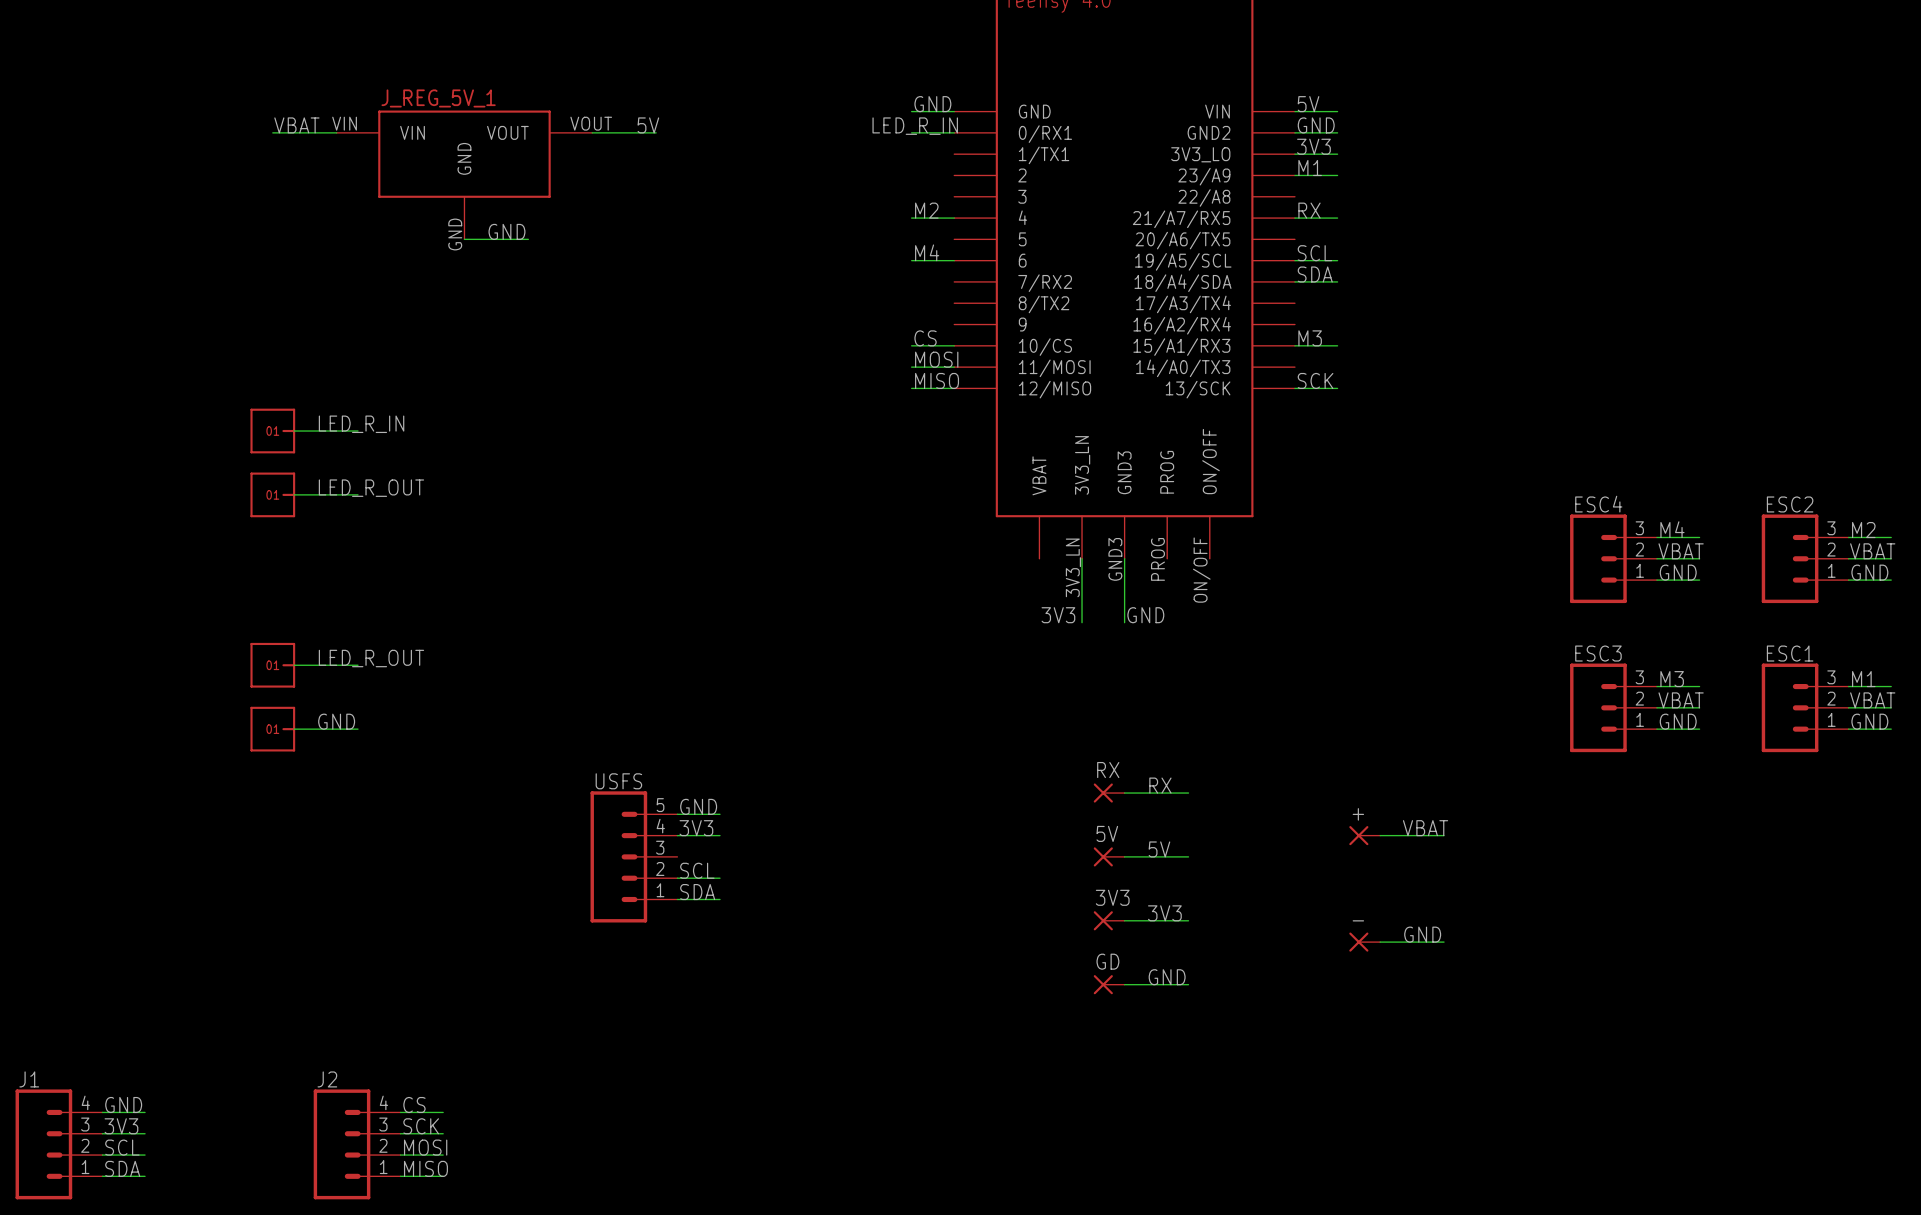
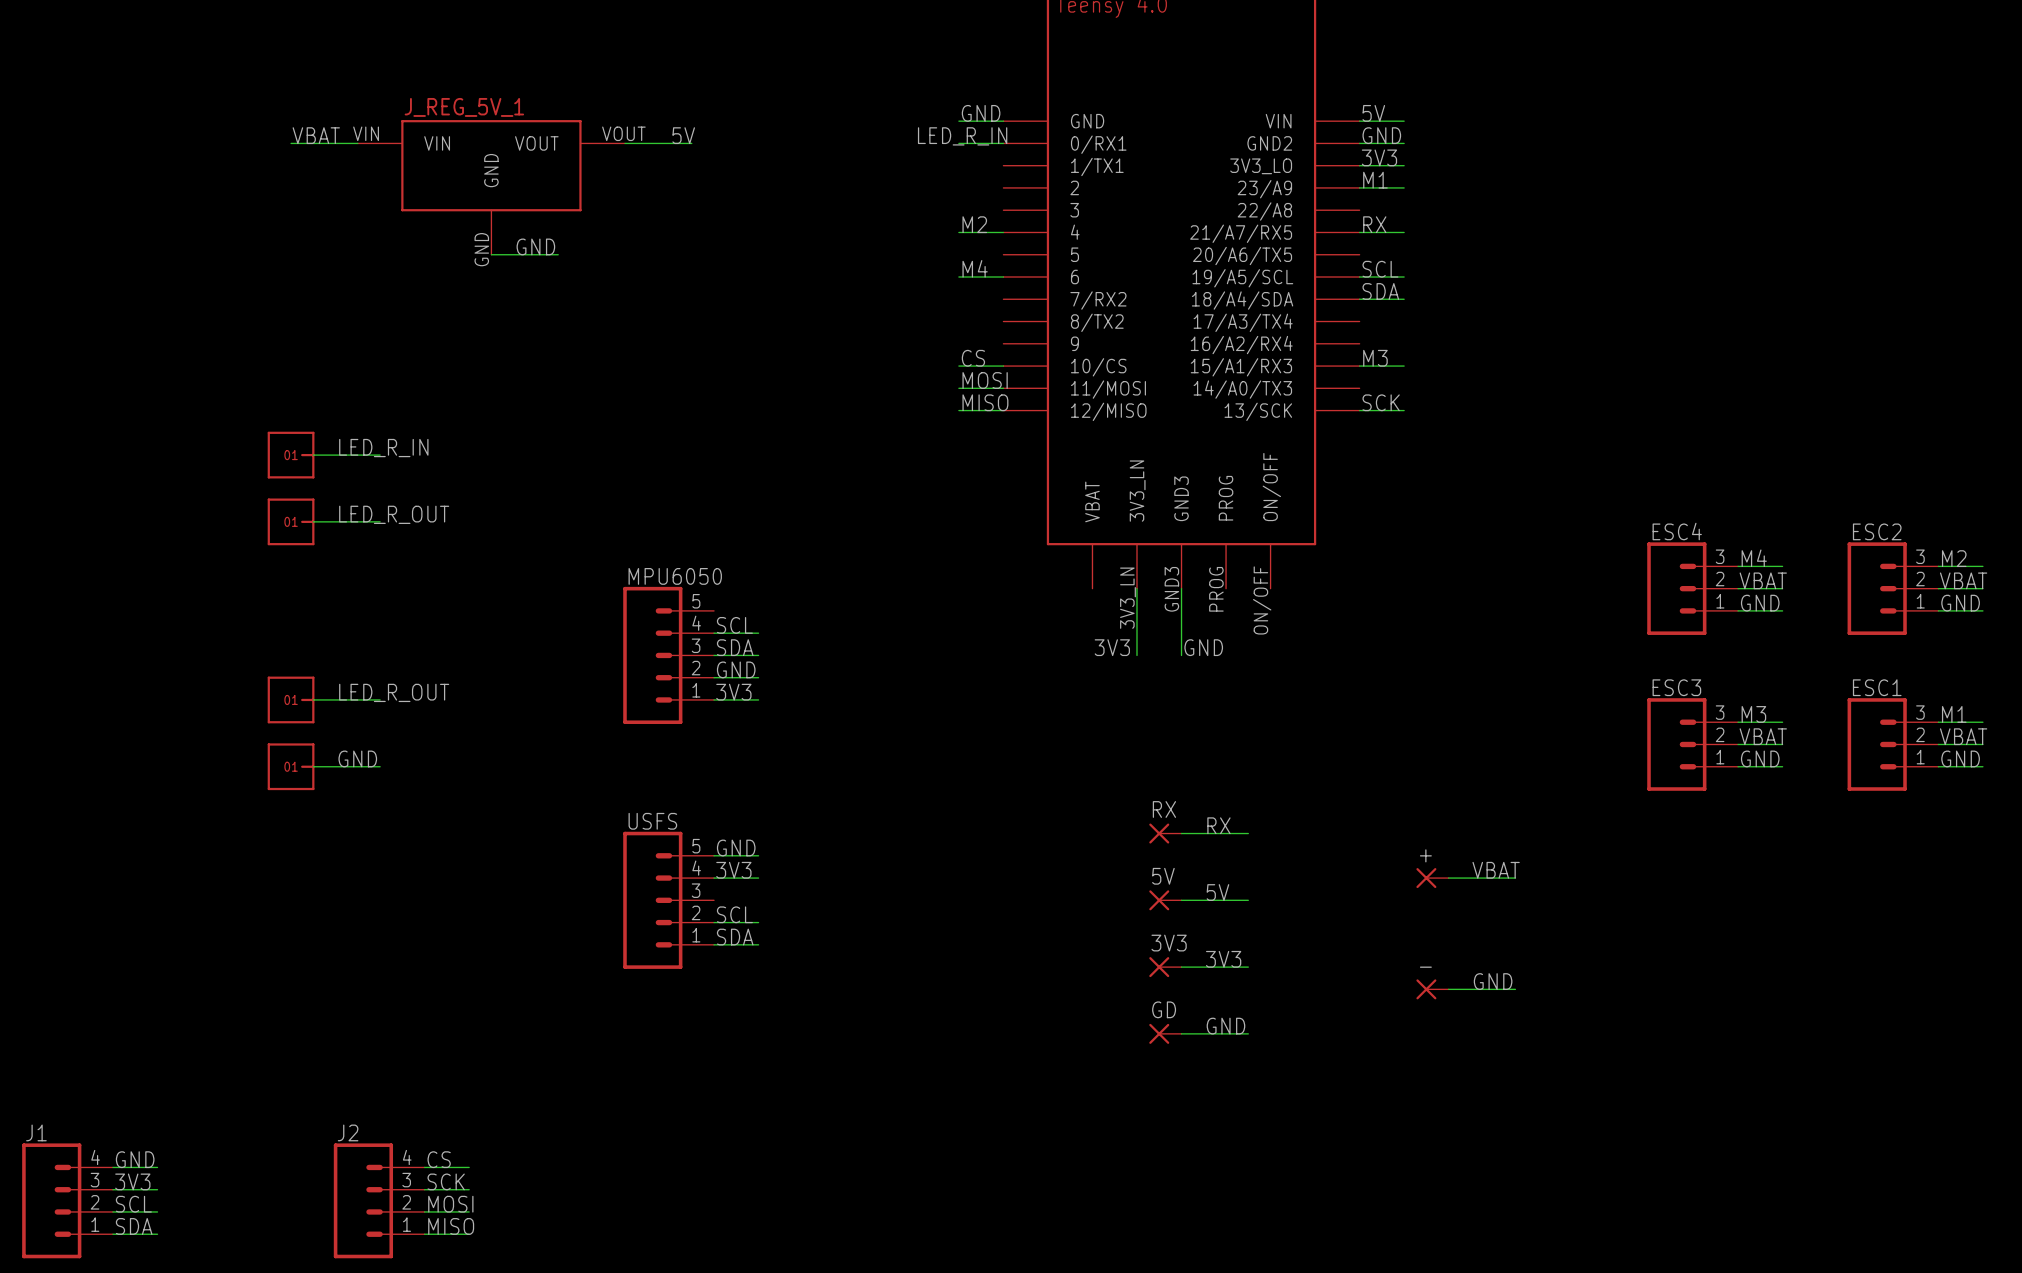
label: none -> SCL (734, 625)
wire: none -> (714, 633) (758, 633)
label: none -> SDA (735, 647)
MPU6050: none -> (668, 655)
wire: none -> (714, 655) (758, 655)
label: none -> GND (736, 669)
wire: none -> (714, 677) (758, 677)
label: none -> 3V3 (733, 692)
wire: none -> (714, 699) (758, 699)

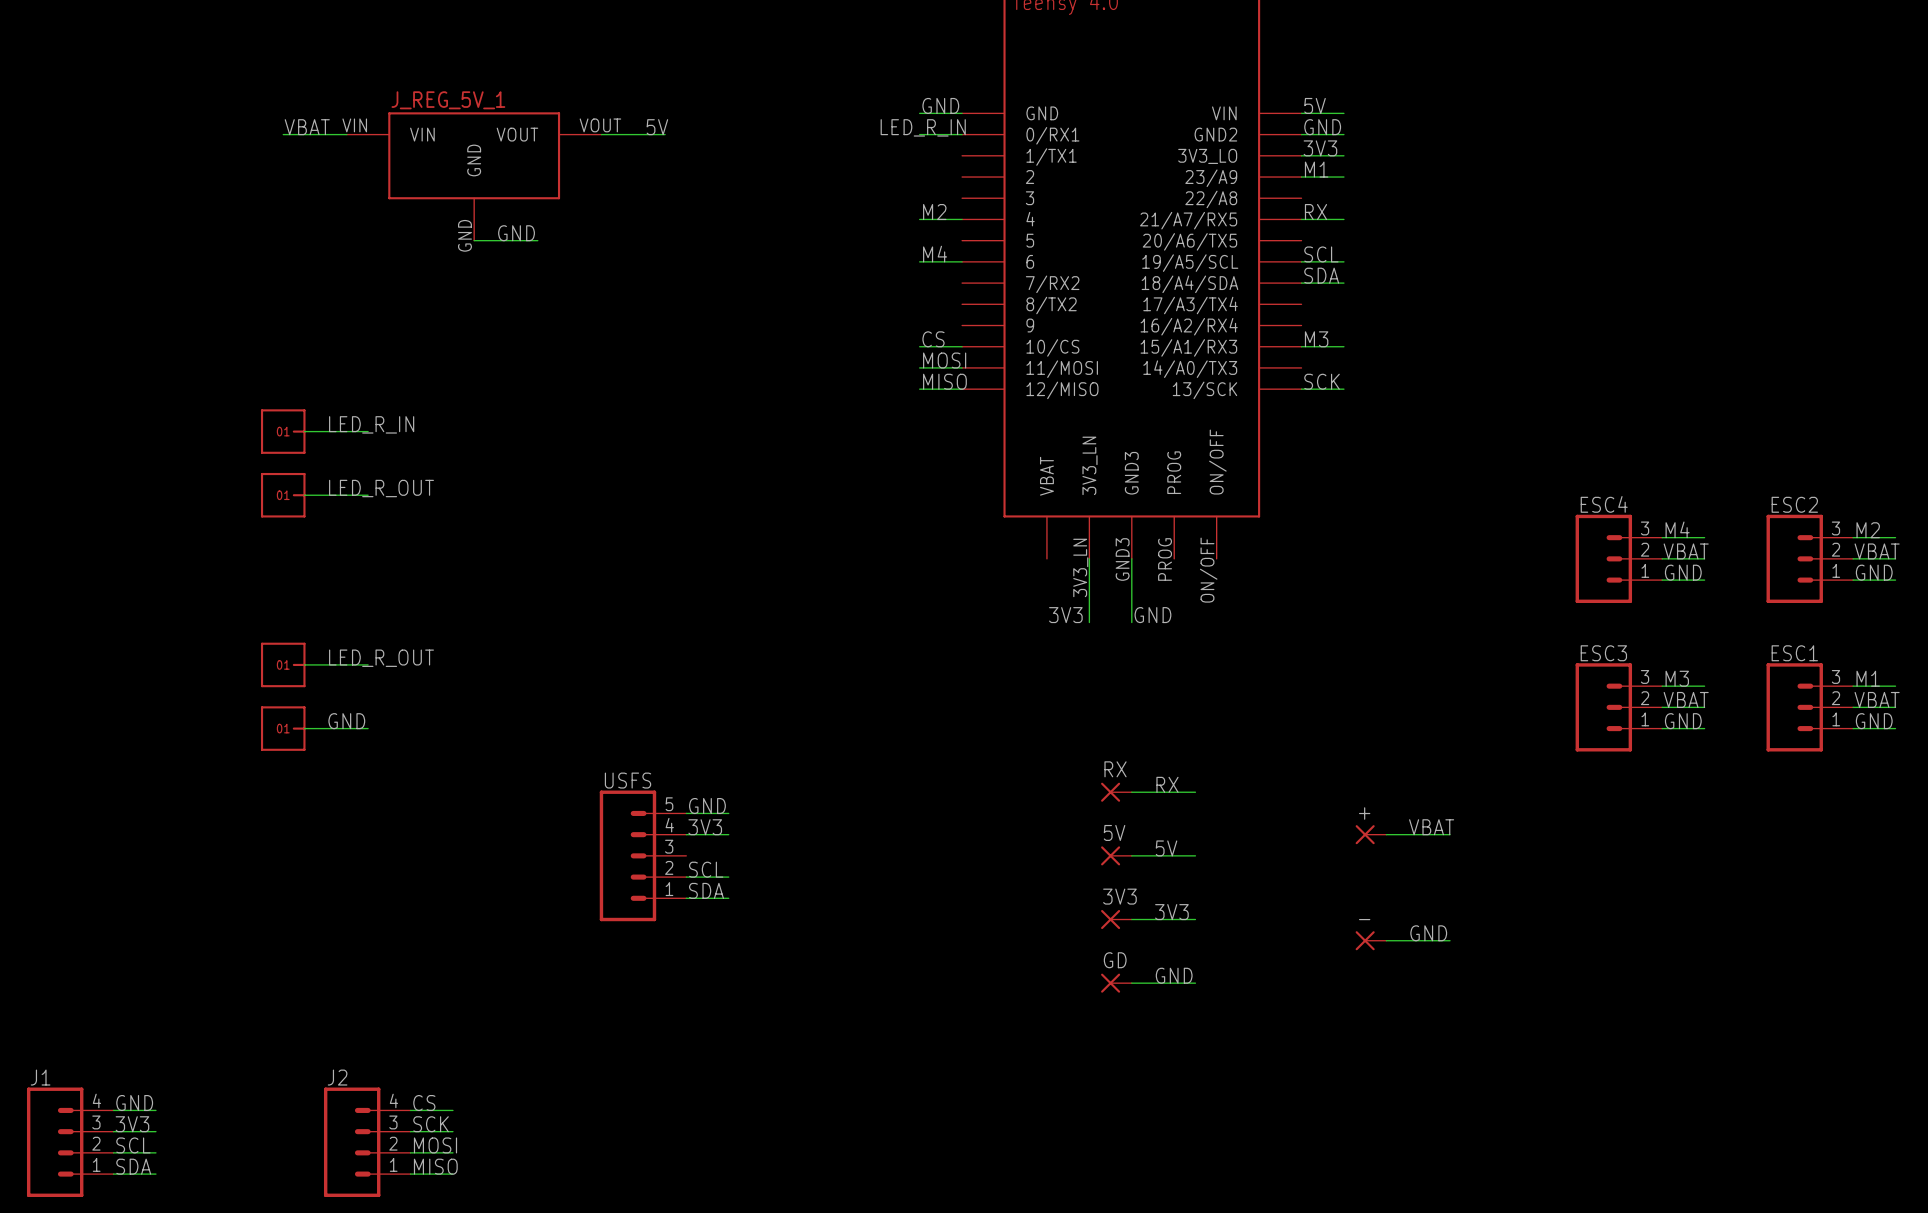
label: SCL (734, 625) -> none
wire: (714, 633) (758, 633) -> none
label: SDA (735, 647) -> none
MPU6050: (668, 655) -> none
wire: (714, 655) (758, 655) -> none
label: GND (736, 669) -> none
wire: (714, 677) (758, 677) -> none
label: 3V3 (733, 692) -> none
wire: (714, 699) (758, 699) -> none

